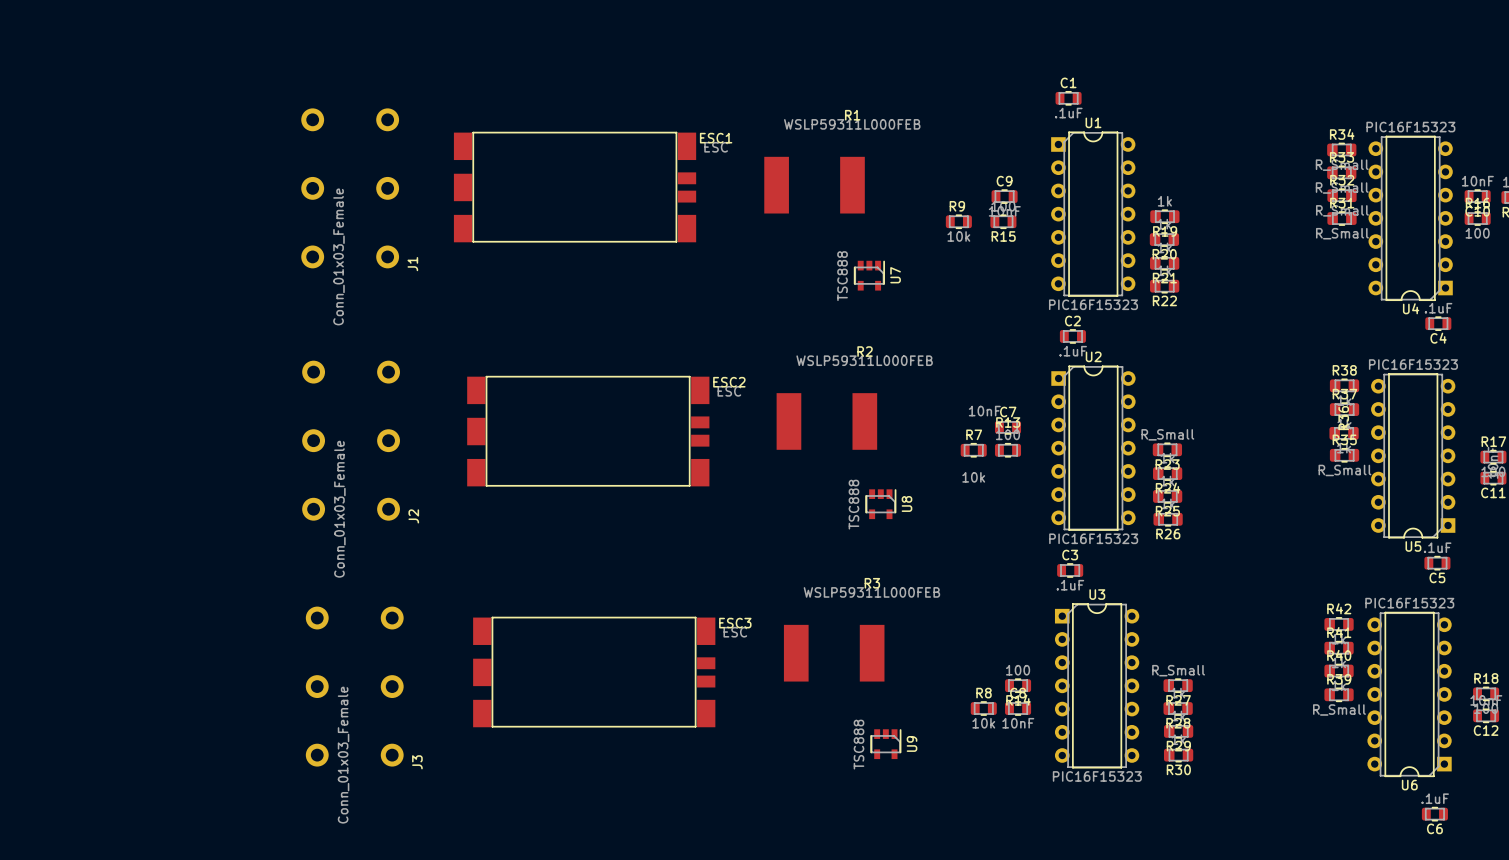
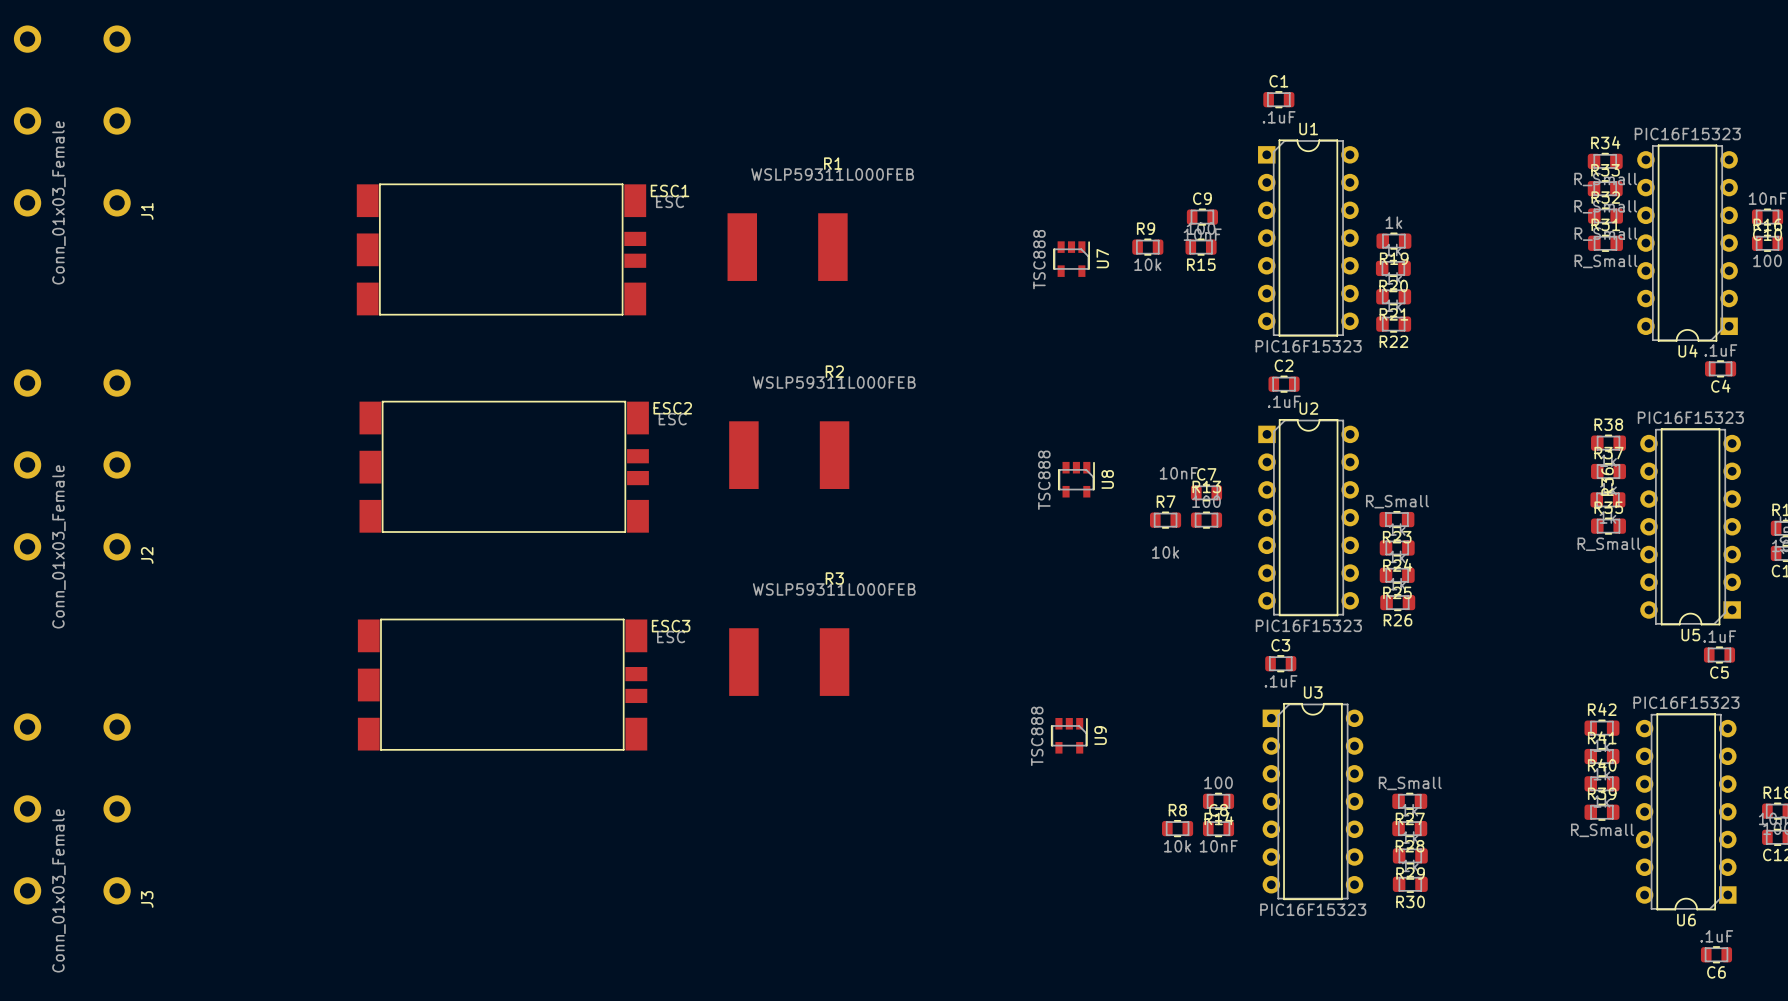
R1 position: (814, 185) -> (787, 247)
ESC1 position: (575, 187) -> (501, 249)
J1 position: (350, 188) -> (72, 120)
U7 position: (869, 275) -> (1071, 259)
R2 position: (826, 421) -> (789, 455)
ESC2 position: (588, 431) -> (504, 466)
J2 position: (351, 440) -> (72, 464)
U8 position: (880, 504) -> (1076, 479)
R3 position: (834, 653) -> (789, 662)
ESC3 position: (594, 672) -> (502, 684)
J3 position: (354, 686) -> (72, 808)
U9 position: (885, 744) -> (1069, 735)

